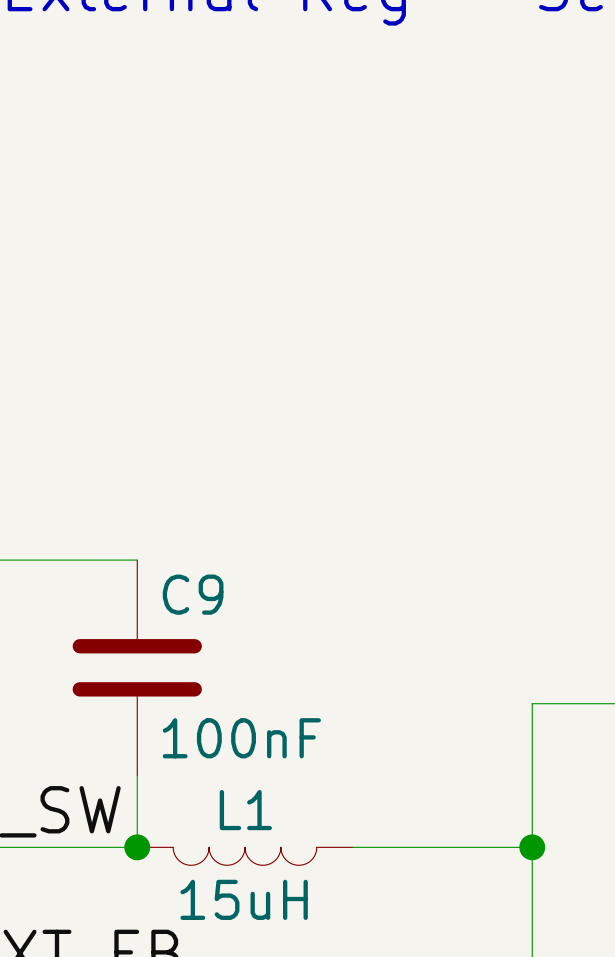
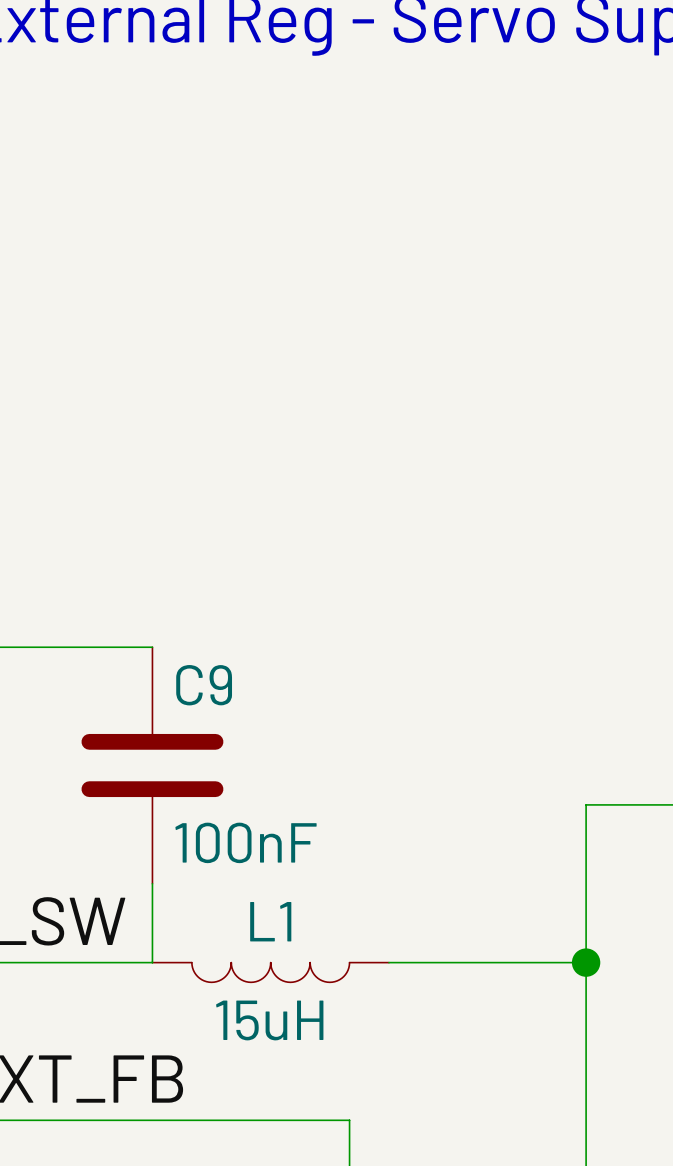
junction: (137, 847) -> none

